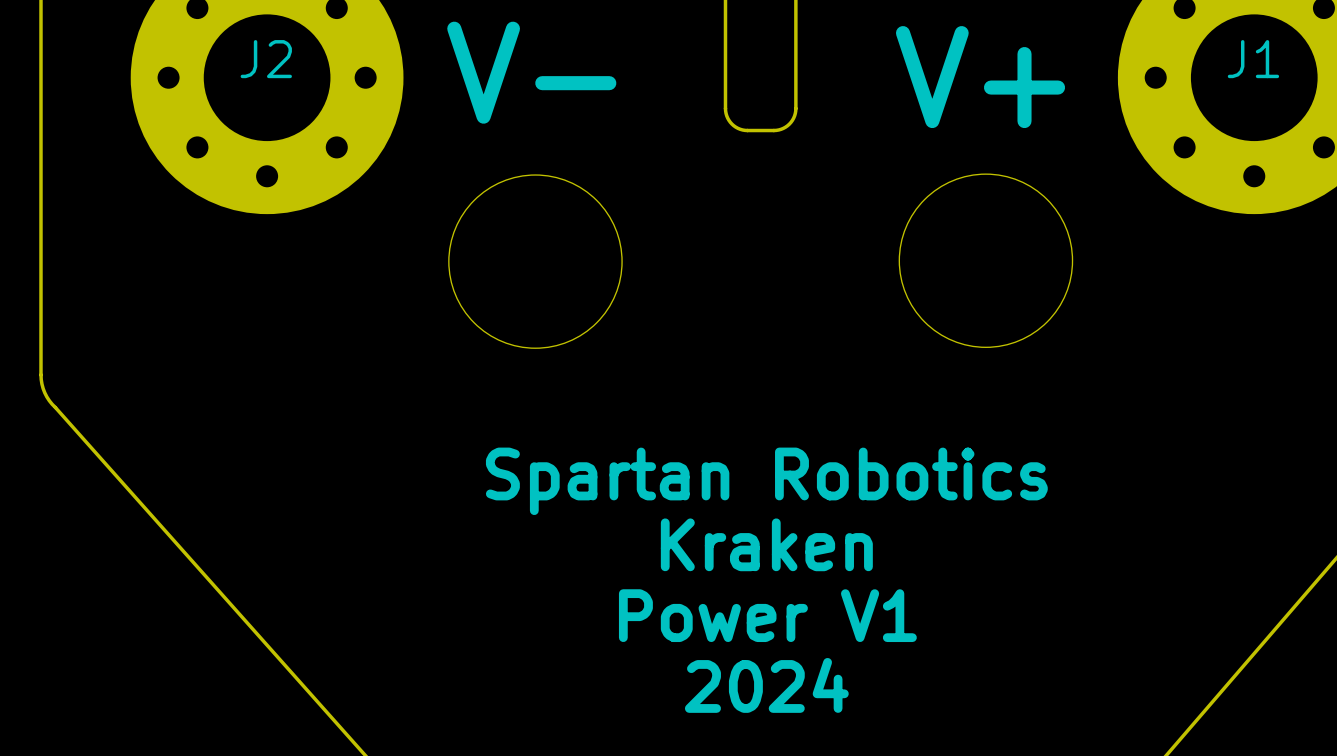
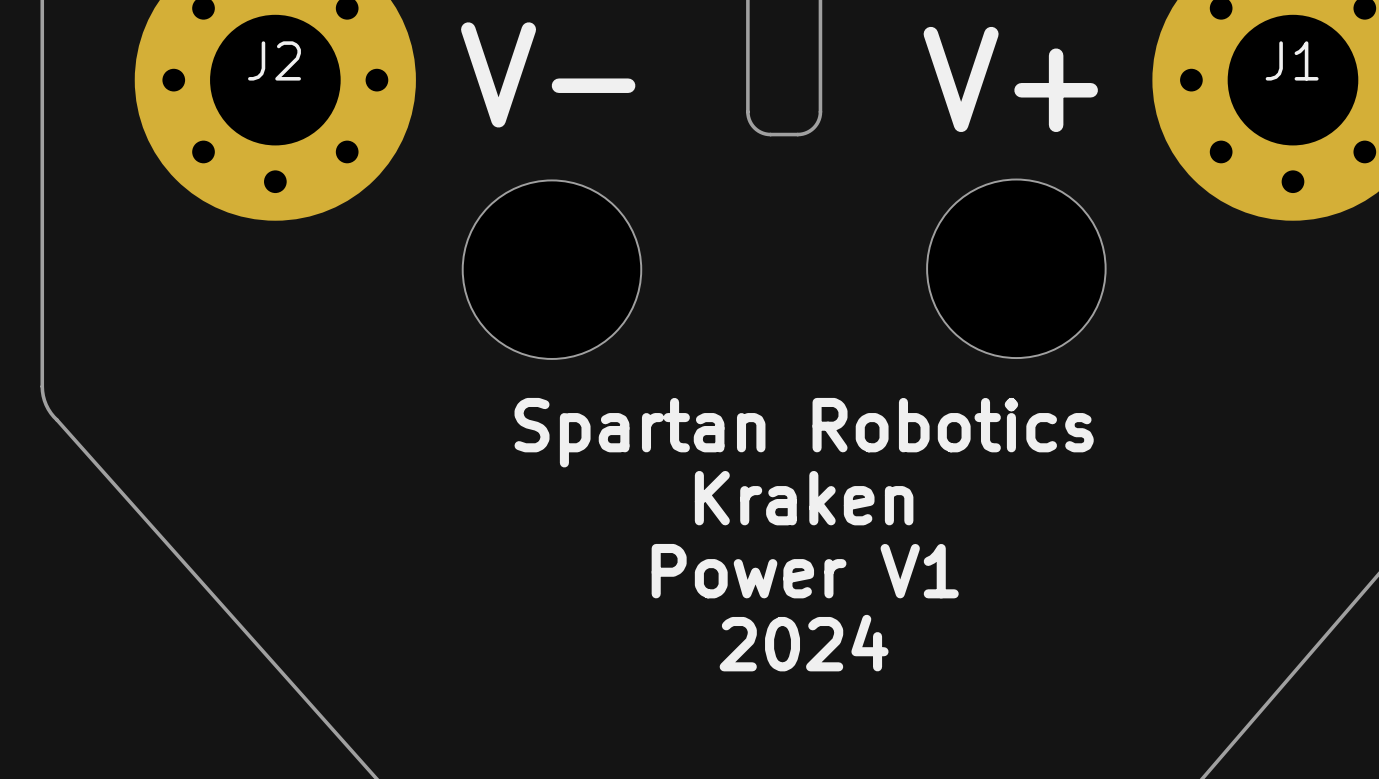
text position: Spartan Robotics (766, 481) -> Spartan Robotics (804, 432)
text position: Kraken (766, 544) -> Kraken (804, 498)
text position: Power V1 (767, 615) -> Power V1 (805, 571)
text position: 2024 (766, 685) -> 2024 (804, 643)

